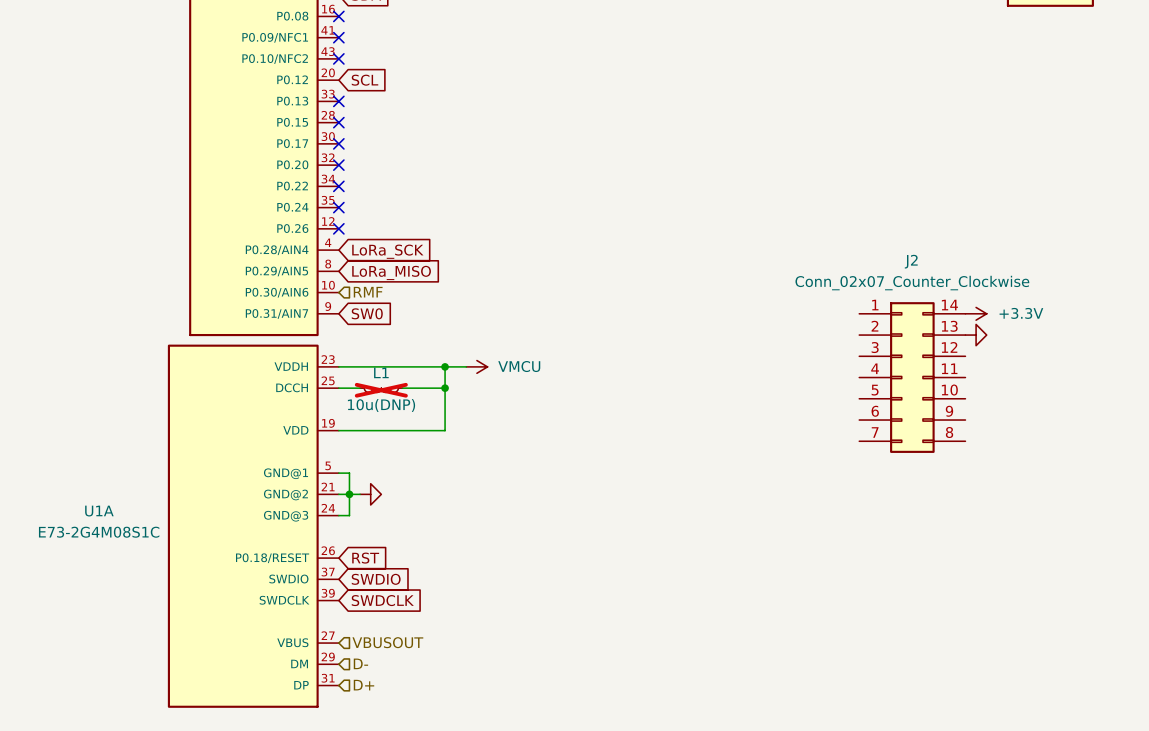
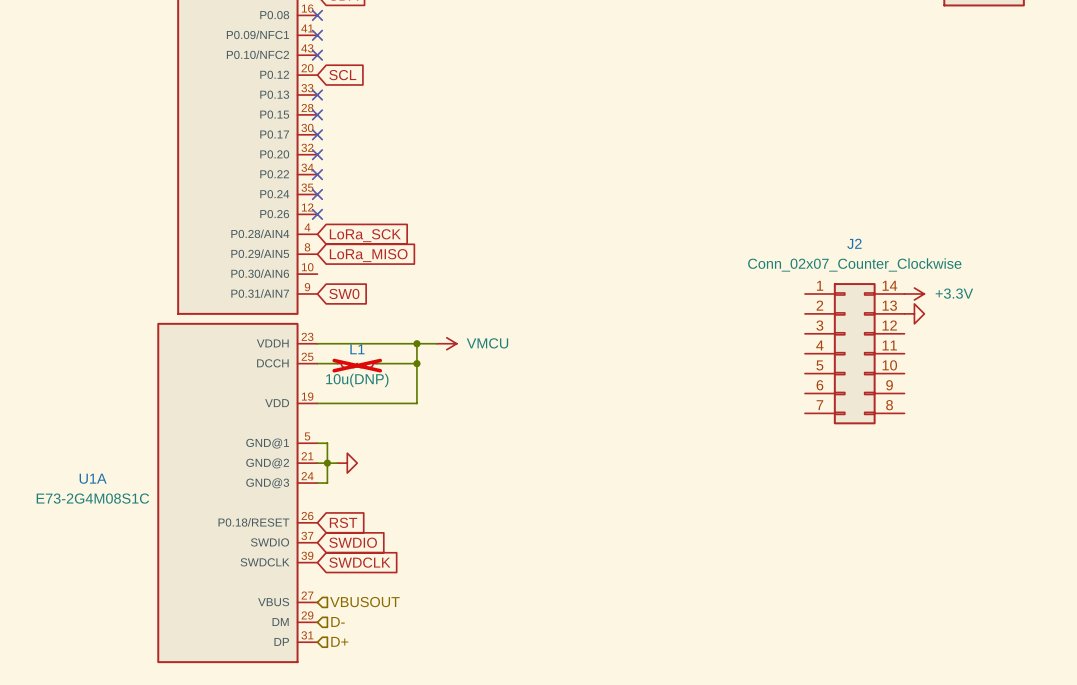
hierarchical label: RMF (368, 292) -> none

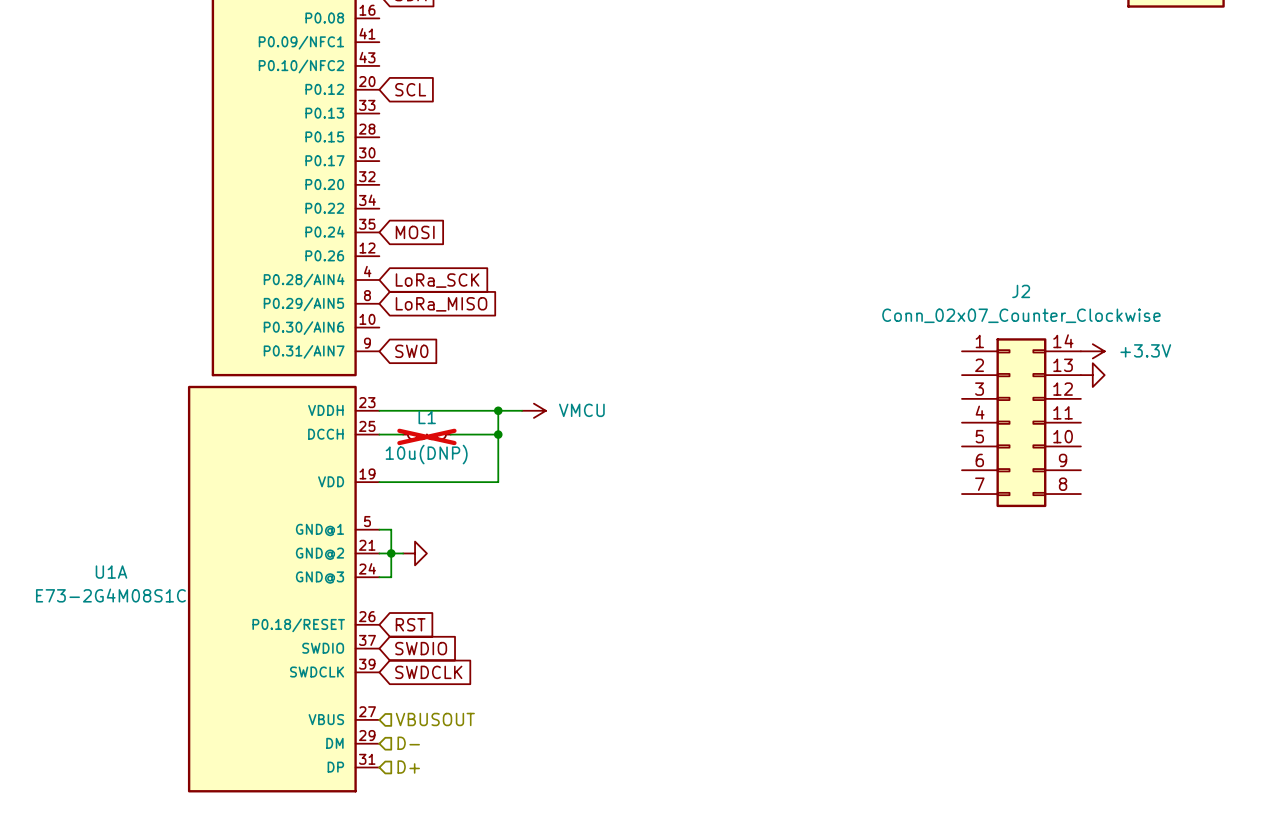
no-connect mark: (317, 15) -> none
no-connect mark: (317, 35) -> none
no-connect mark: (317, 55) -> none
no-connect mark: (317, 95) -> none
no-connect mark: (317, 114) -> none
no-connect mark: (317, 134) -> none
no-connect mark: (317, 154) -> none
no-connect mark: (317, 174) -> none
no-connect mark: (317, 194) -> none
global label: none -> MOSI (415, 232)
no-connect mark: (317, 214) -> none

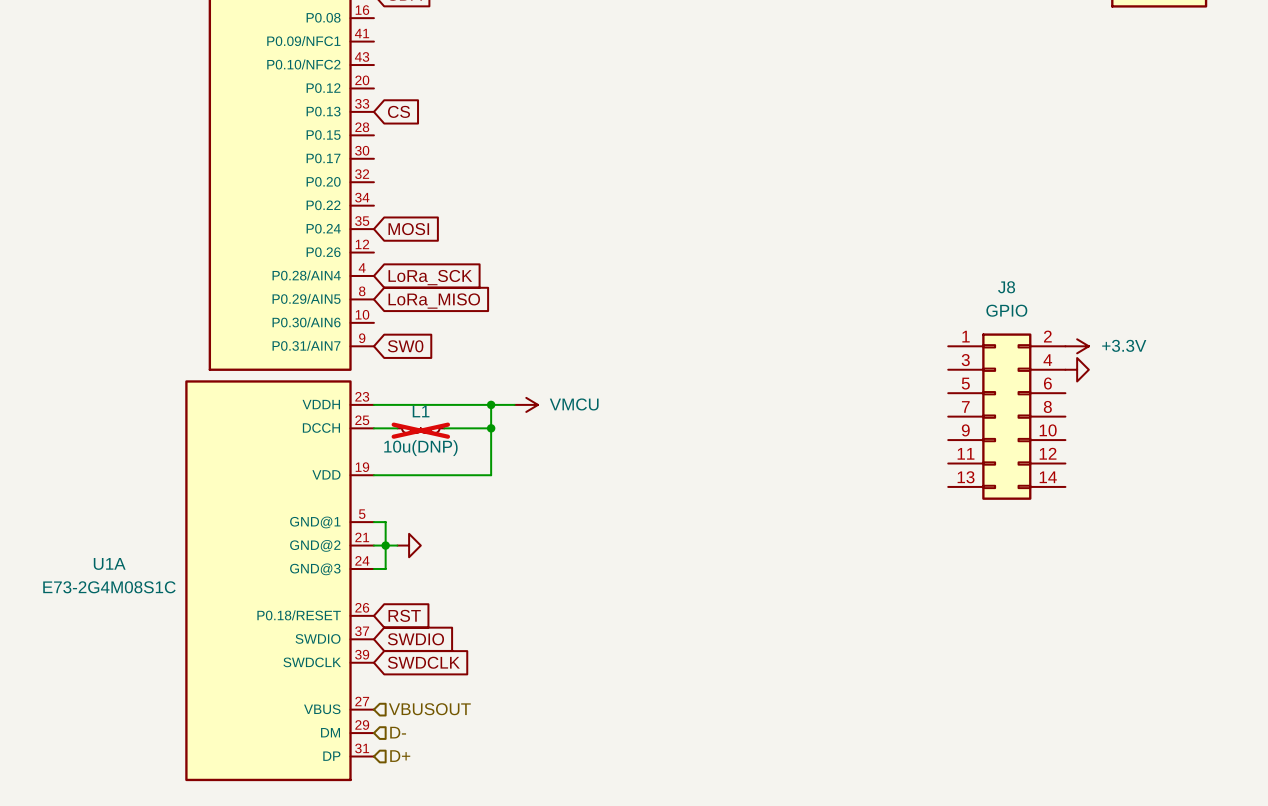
global label: SCL (410, 89) -> none
global label: none -> CS (398, 111)
J2 name: J2 (1021, 291) -> J8 (1006, 287)
J2 value: Conn_02x07_Counter_Clockwise (1021, 315) -> GPIO (1006, 310)
J2 symbol: [961, 338, 1081, 508] -> [948, 333, 1066, 500]

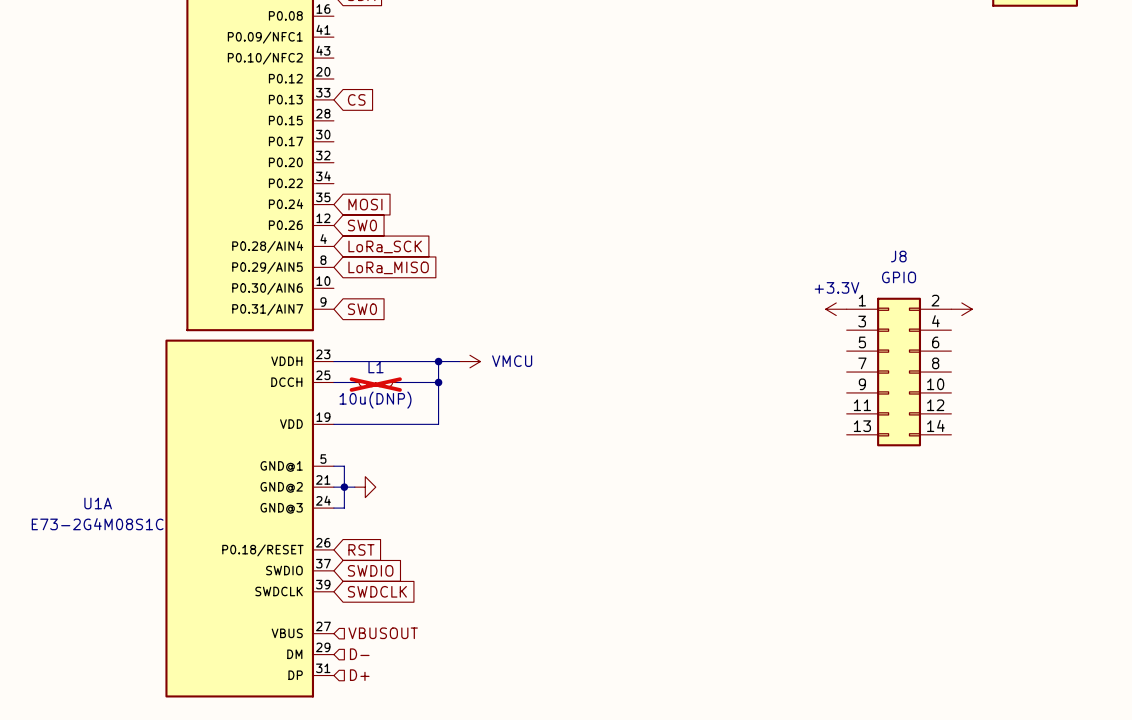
global label: none -> SW0 (362, 225)
power symbol text: +3.3V (1124, 345) -> none
power symbol: none -> +3.3V (836, 309)
power symbol: (1077, 369) -> none

